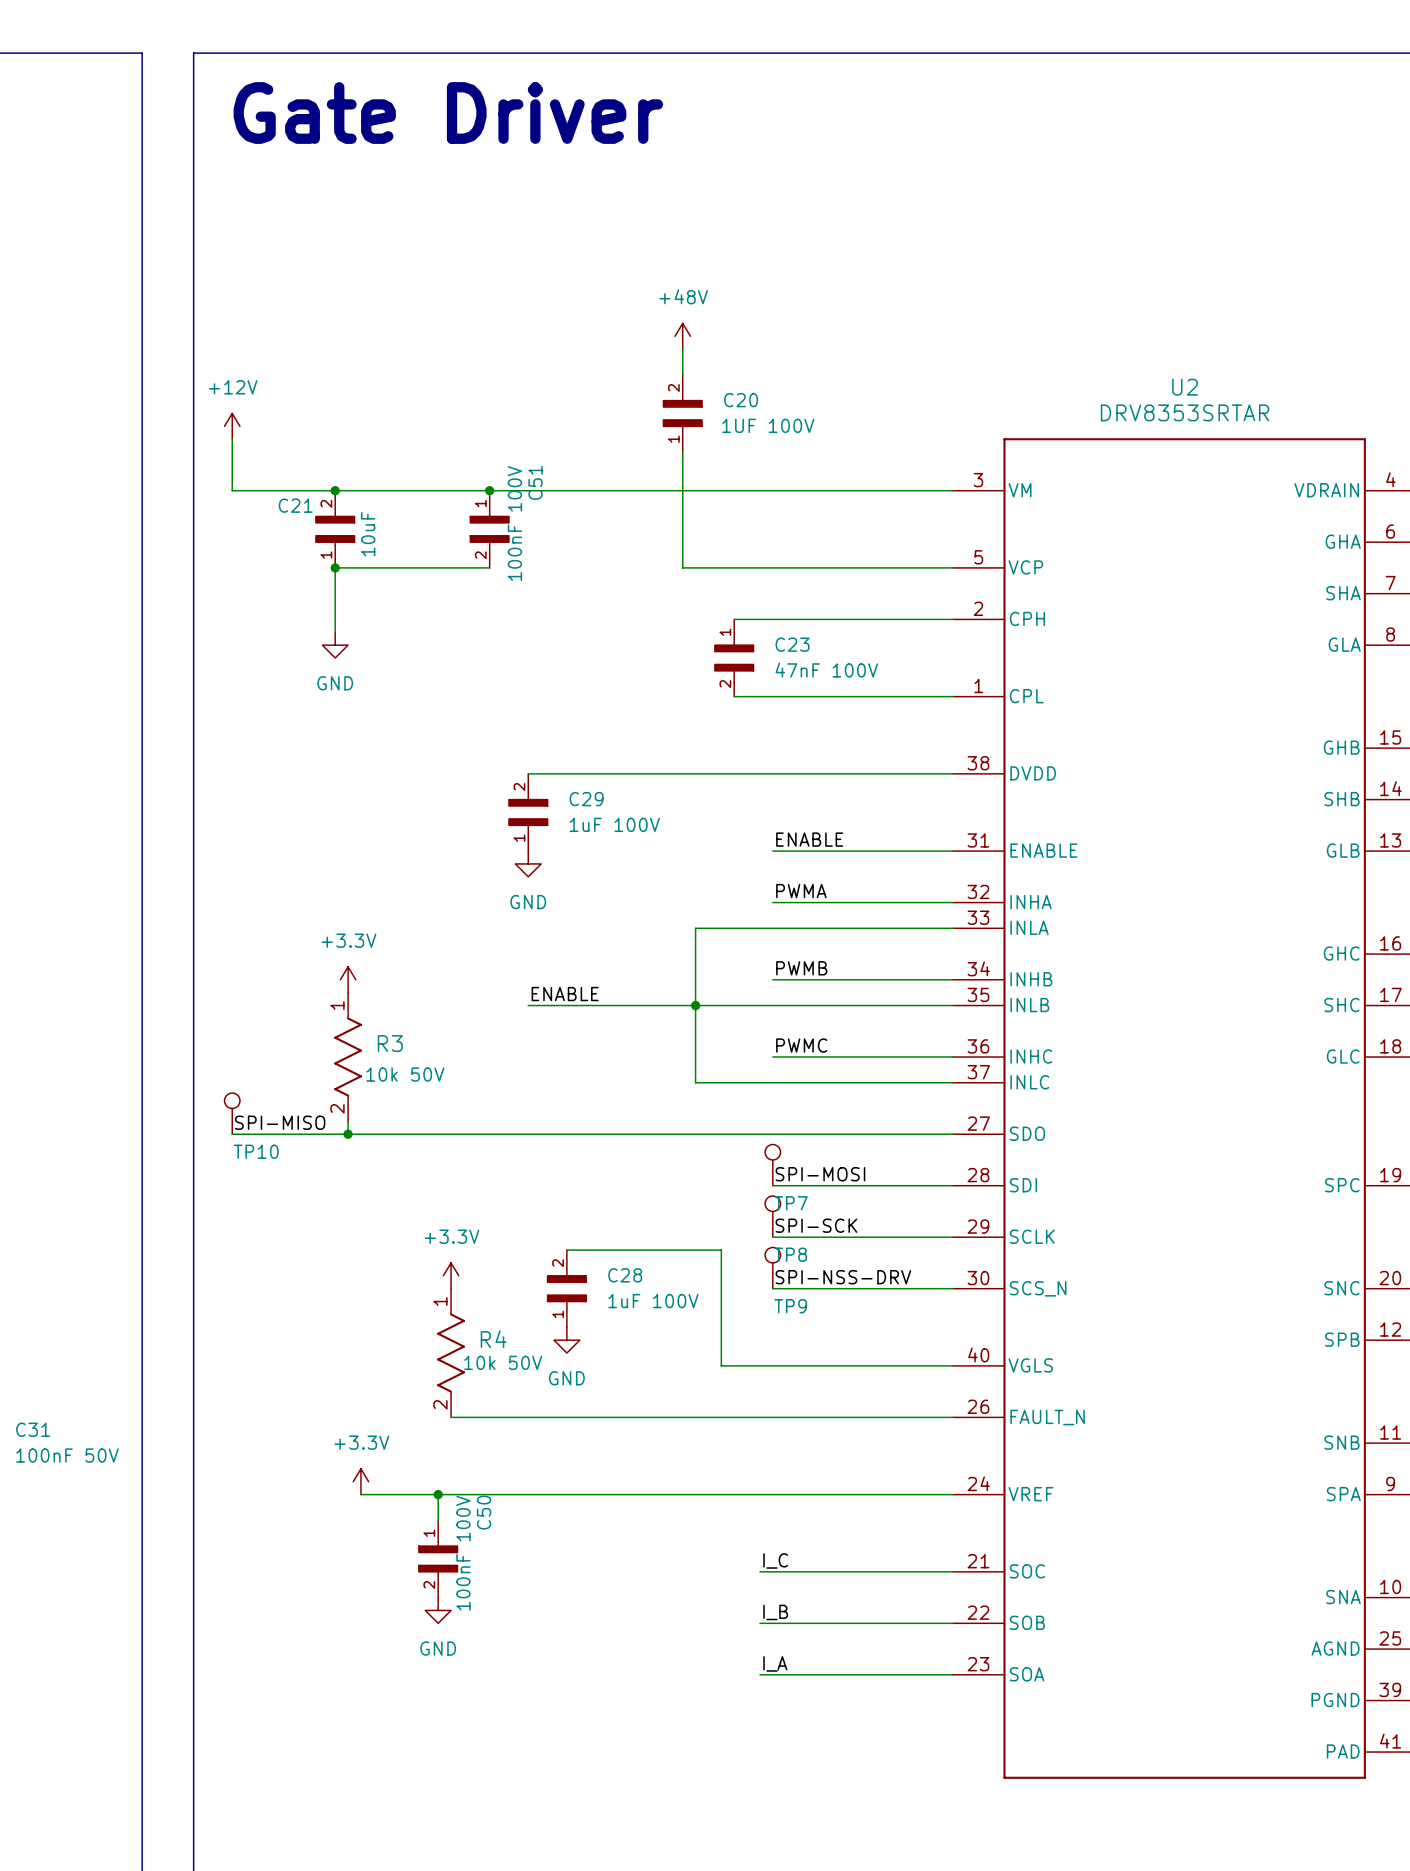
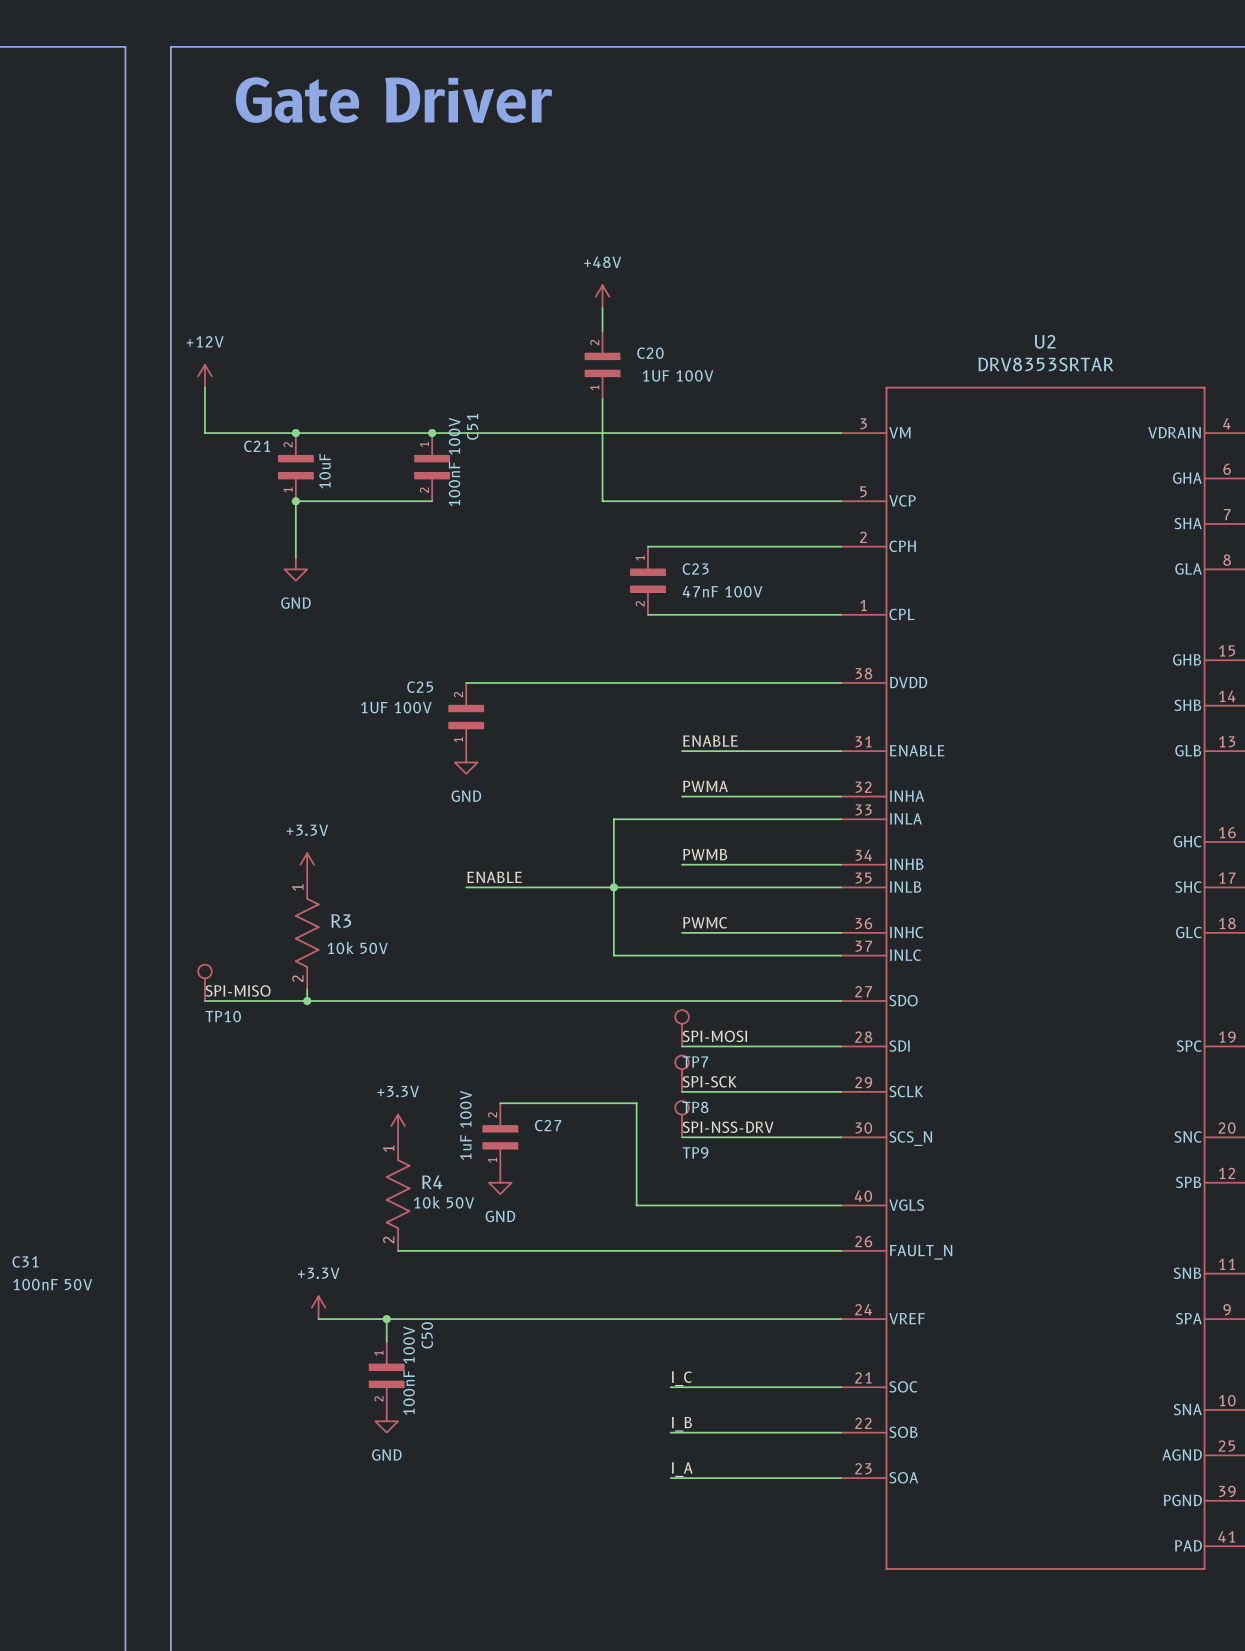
C29 name: C29 (586, 799) -> C25 (420, 687)
C29 text: none -> 1UF 100V (396, 707)
C29 value: 1uF 100V (614, 824) -> none
C28 text: none -> 1uF 100V (465, 1125)
C28 name: C28 (625, 1275) -> C27 (548, 1125)
C28 value: 1uF 100V (653, 1301) -> none

